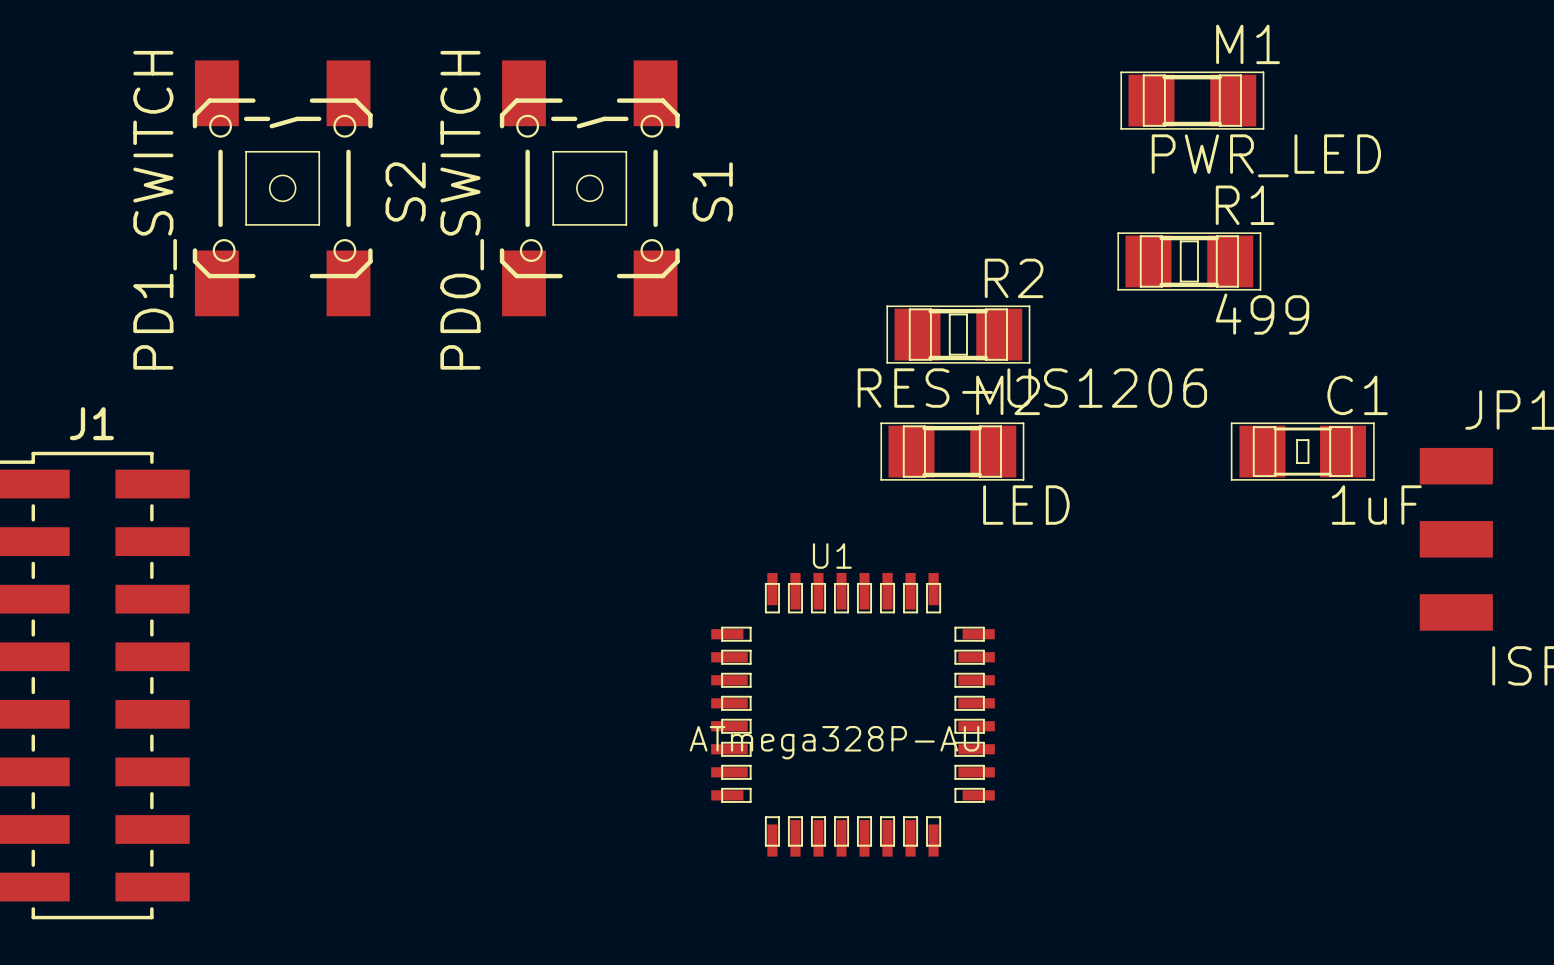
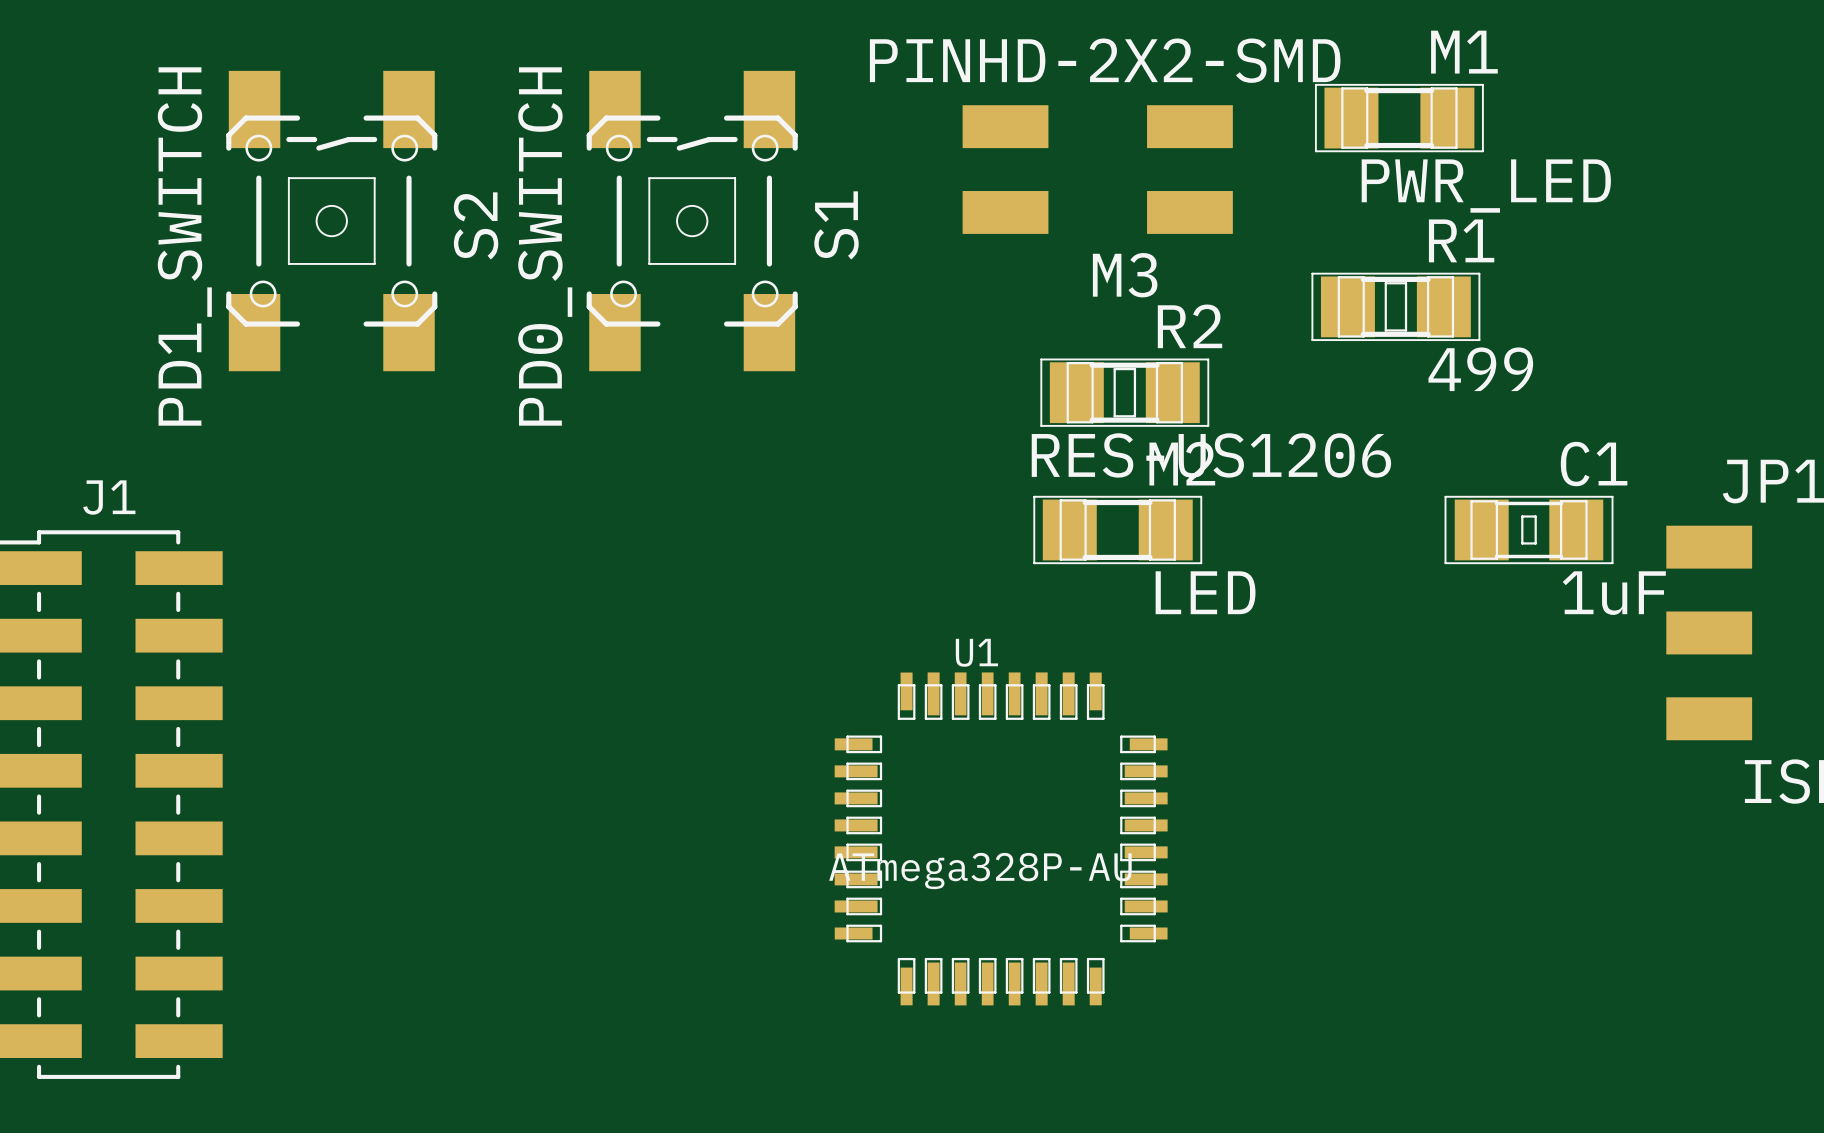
M3: none -> PINHD-2X2-SMD (1097, 169)

